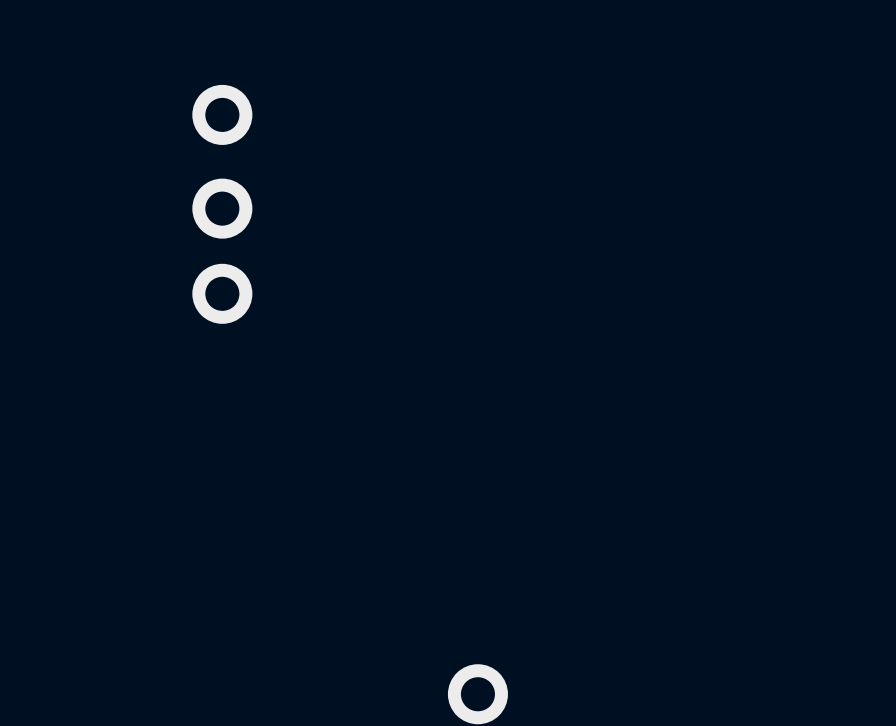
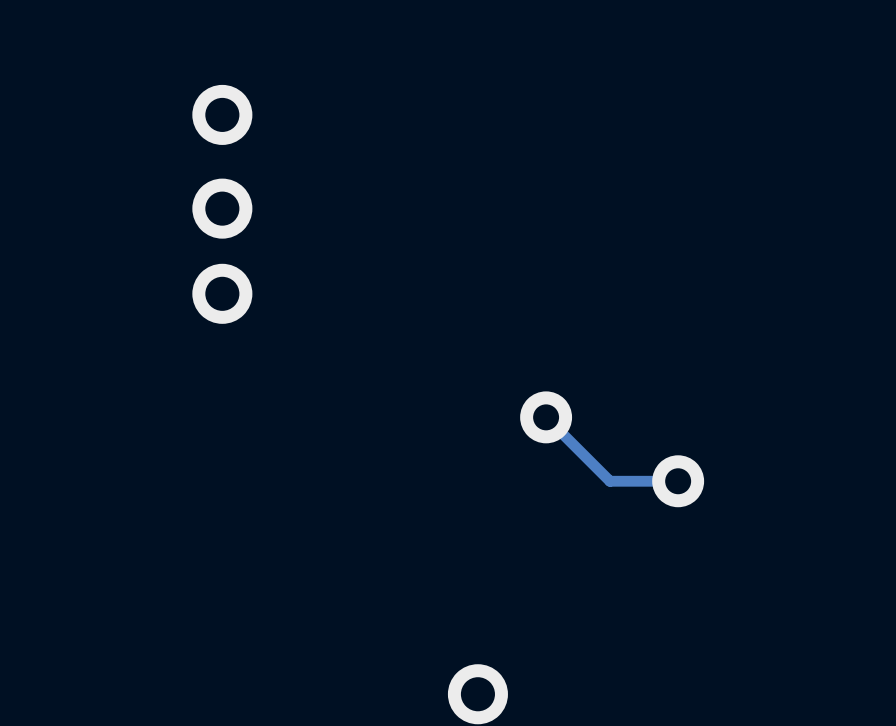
track: none -> (546, 417) (609, 481) (678, 481)
via: none -> (546, 417)
via: none -> (678, 481)

